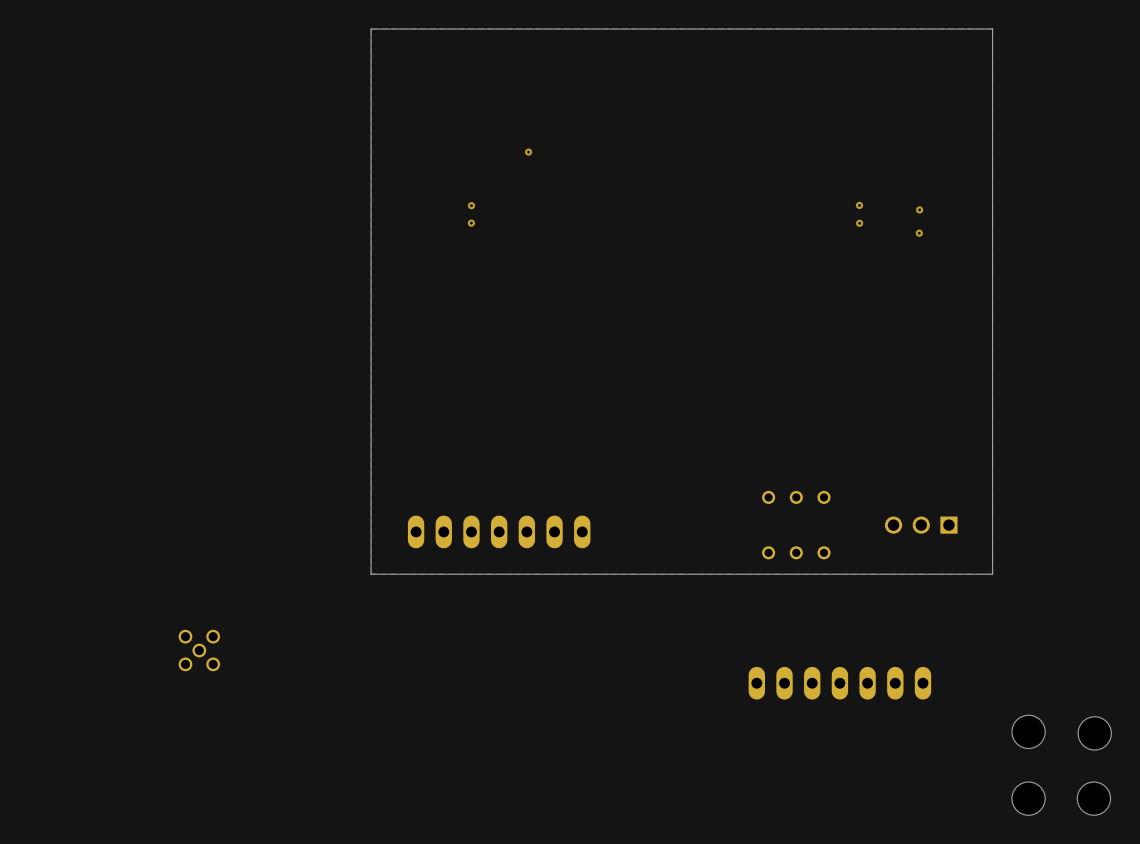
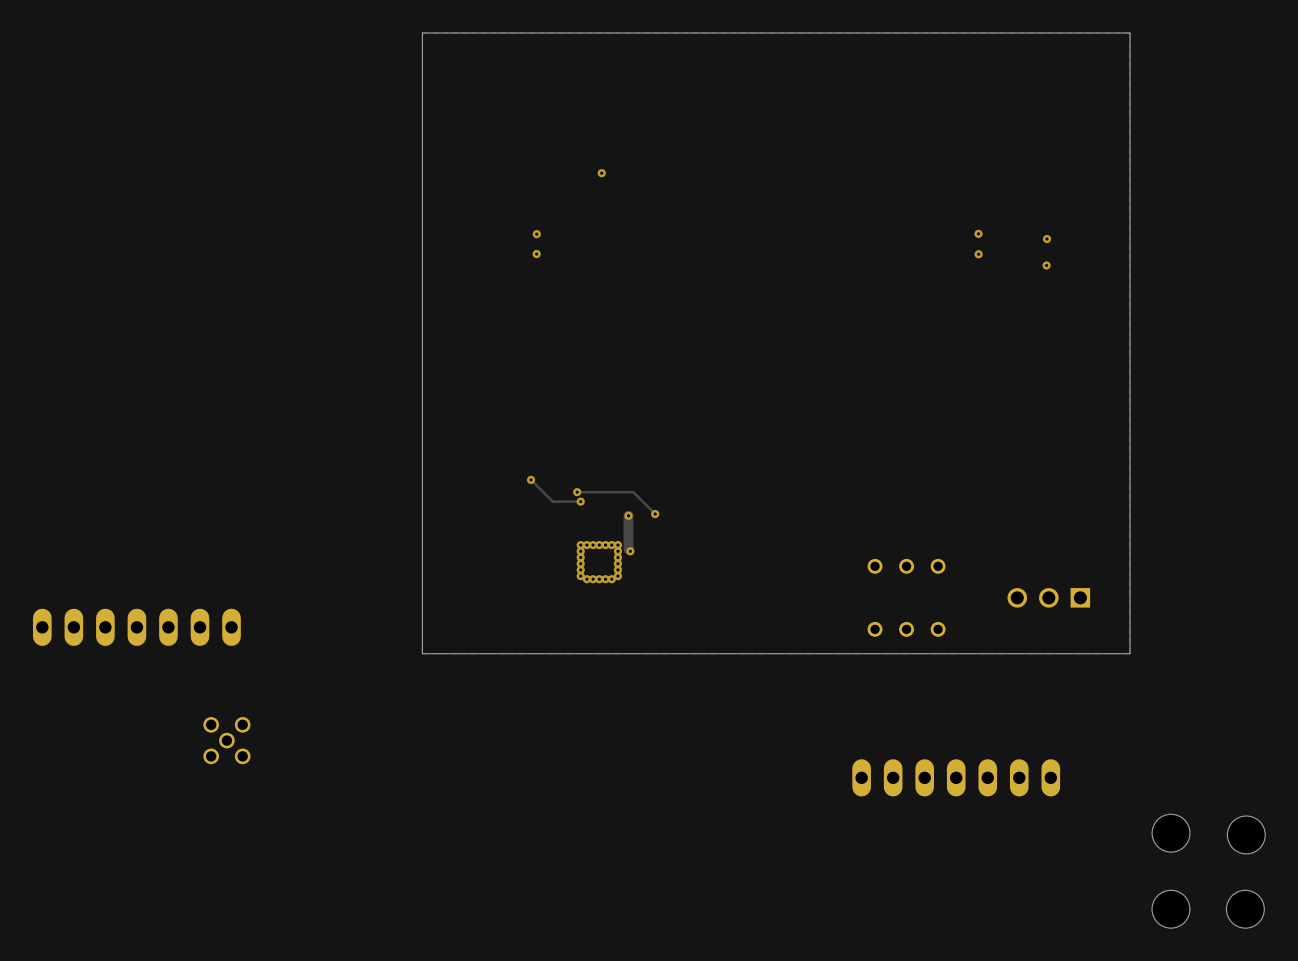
track: none -> (531, 479) (552, 501) (580, 501)
via: none -> (531, 479)
track: none -> (577, 492) (633, 492) (655, 514)
via: none -> (577, 492)
via: none -> (580, 501)
via: none -> (655, 514)
track: none -> (628, 515) (628, 549) (630, 551)
via: none -> (628, 515)
via: none -> (580, 545)
via: none -> (586, 545)
via: none -> (593, 545)
via: none -> (599, 545)
via: none -> (605, 545)
via: none -> (611, 545)
via: none -> (617, 545)
via: none -> (580, 551)
via: none -> (617, 551)
via: none -> (630, 551)
via: none -> (580, 557)
via: none -> (617, 557)
via: none -> (580, 563)
via: none -> (617, 563)
via: none -> (580, 569)
via: none -> (617, 569)
via: none -> (580, 576)
via: none -> (617, 576)
via: none -> (586, 579)
via: none -> (593, 579)
via: none -> (599, 579)
via: none -> (605, 579)
via: none -> (611, 579)
part: (499, 531) -> none
part: none -> (136, 627)

